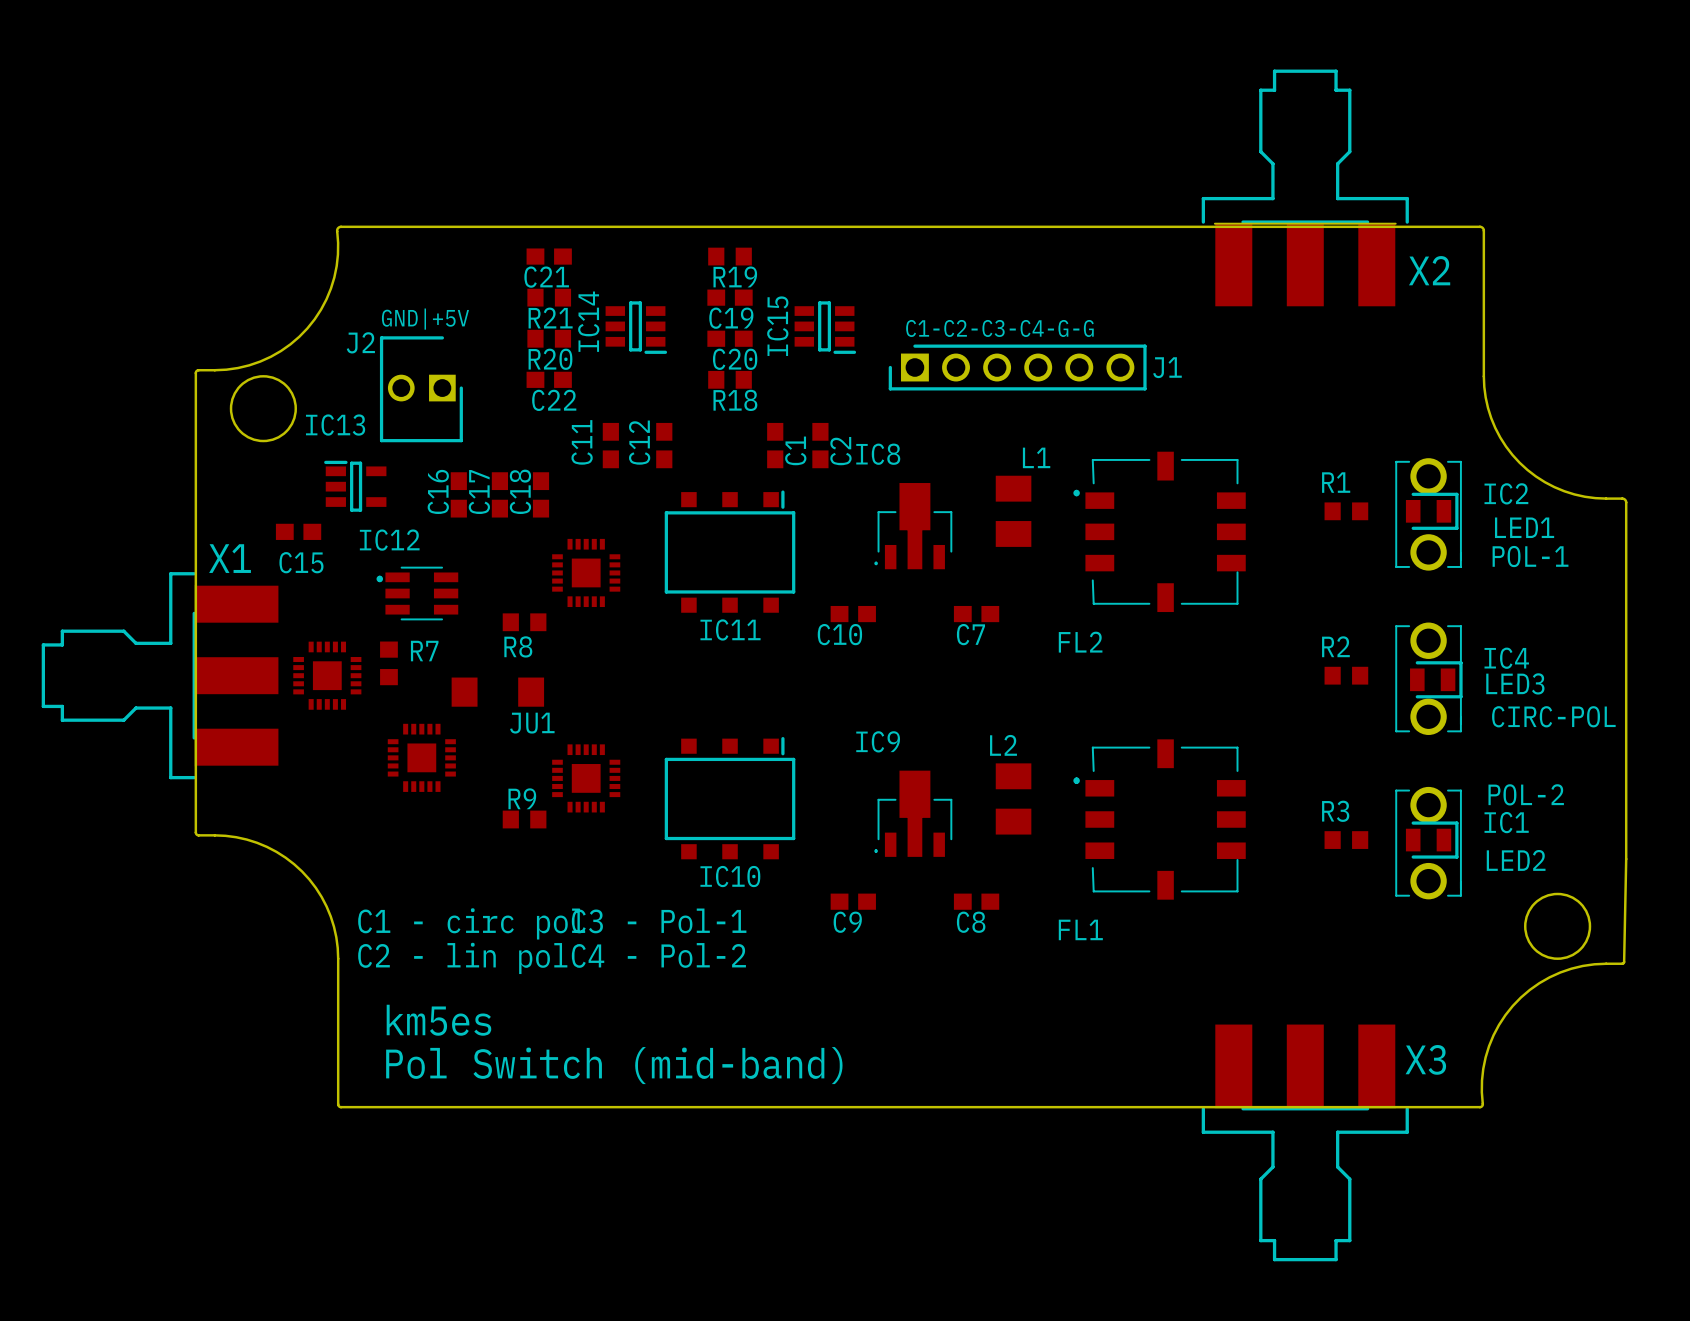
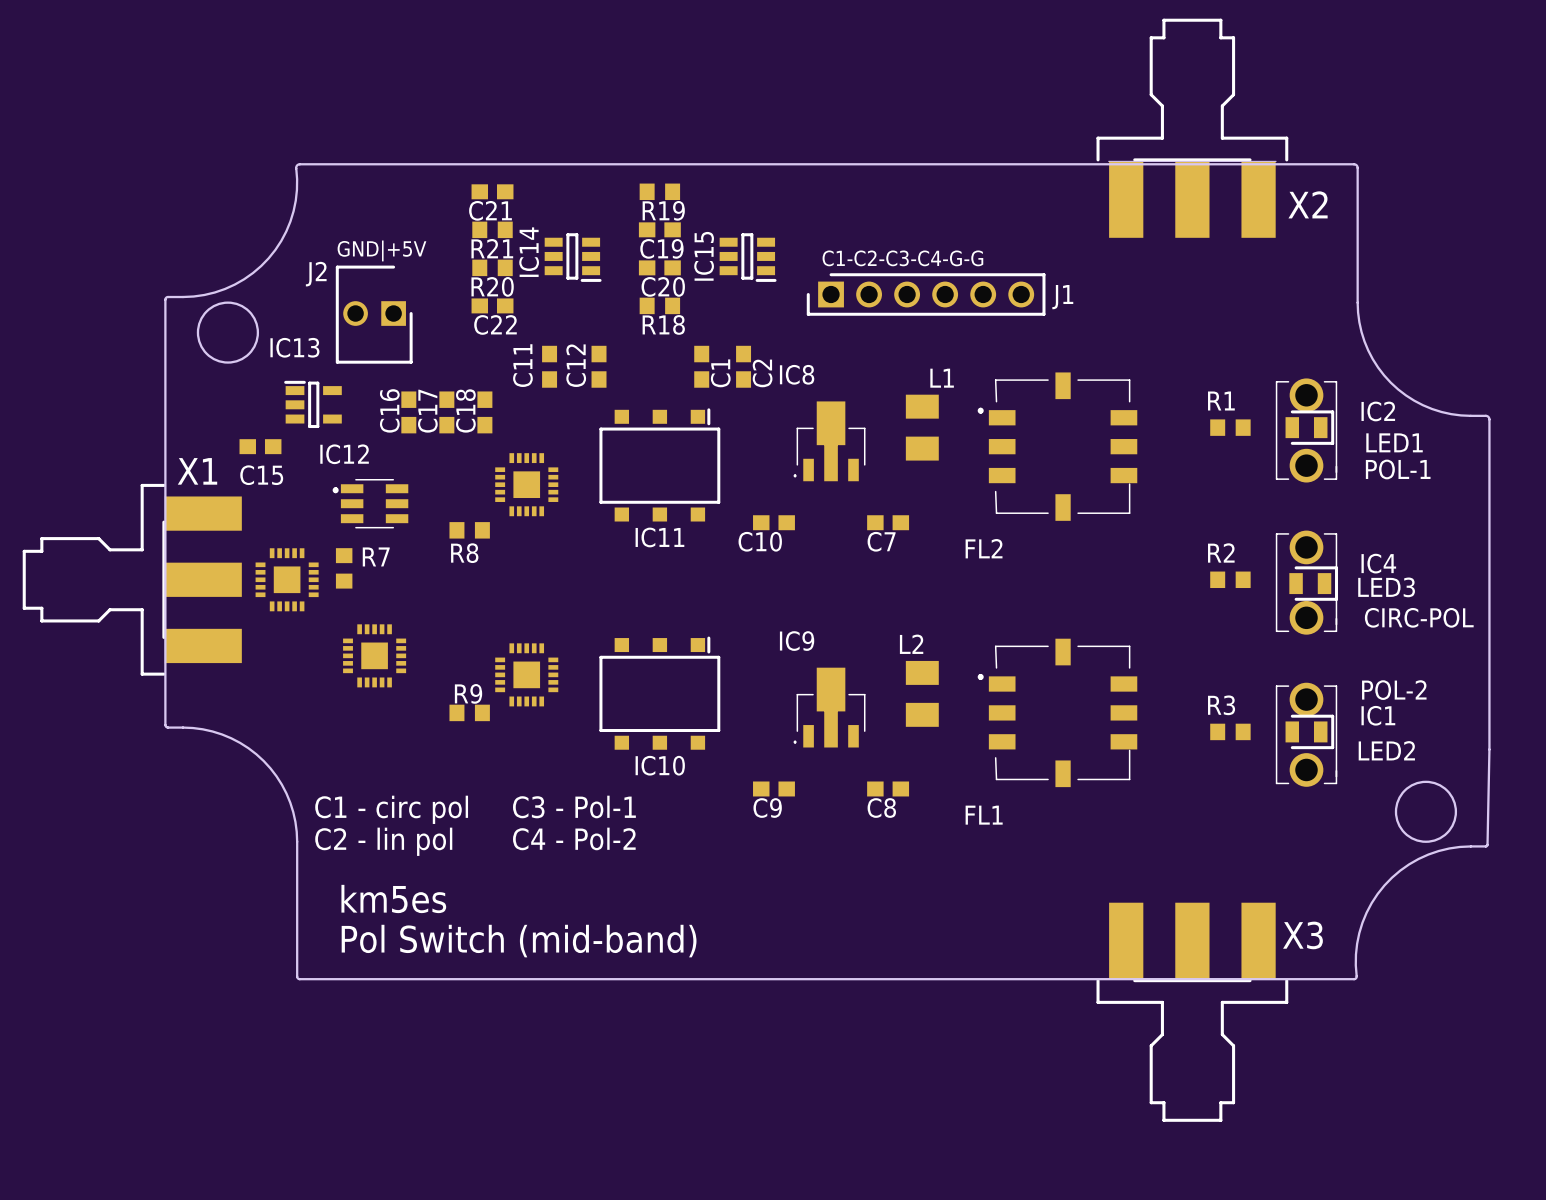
JU1: (497, 692) -> none

